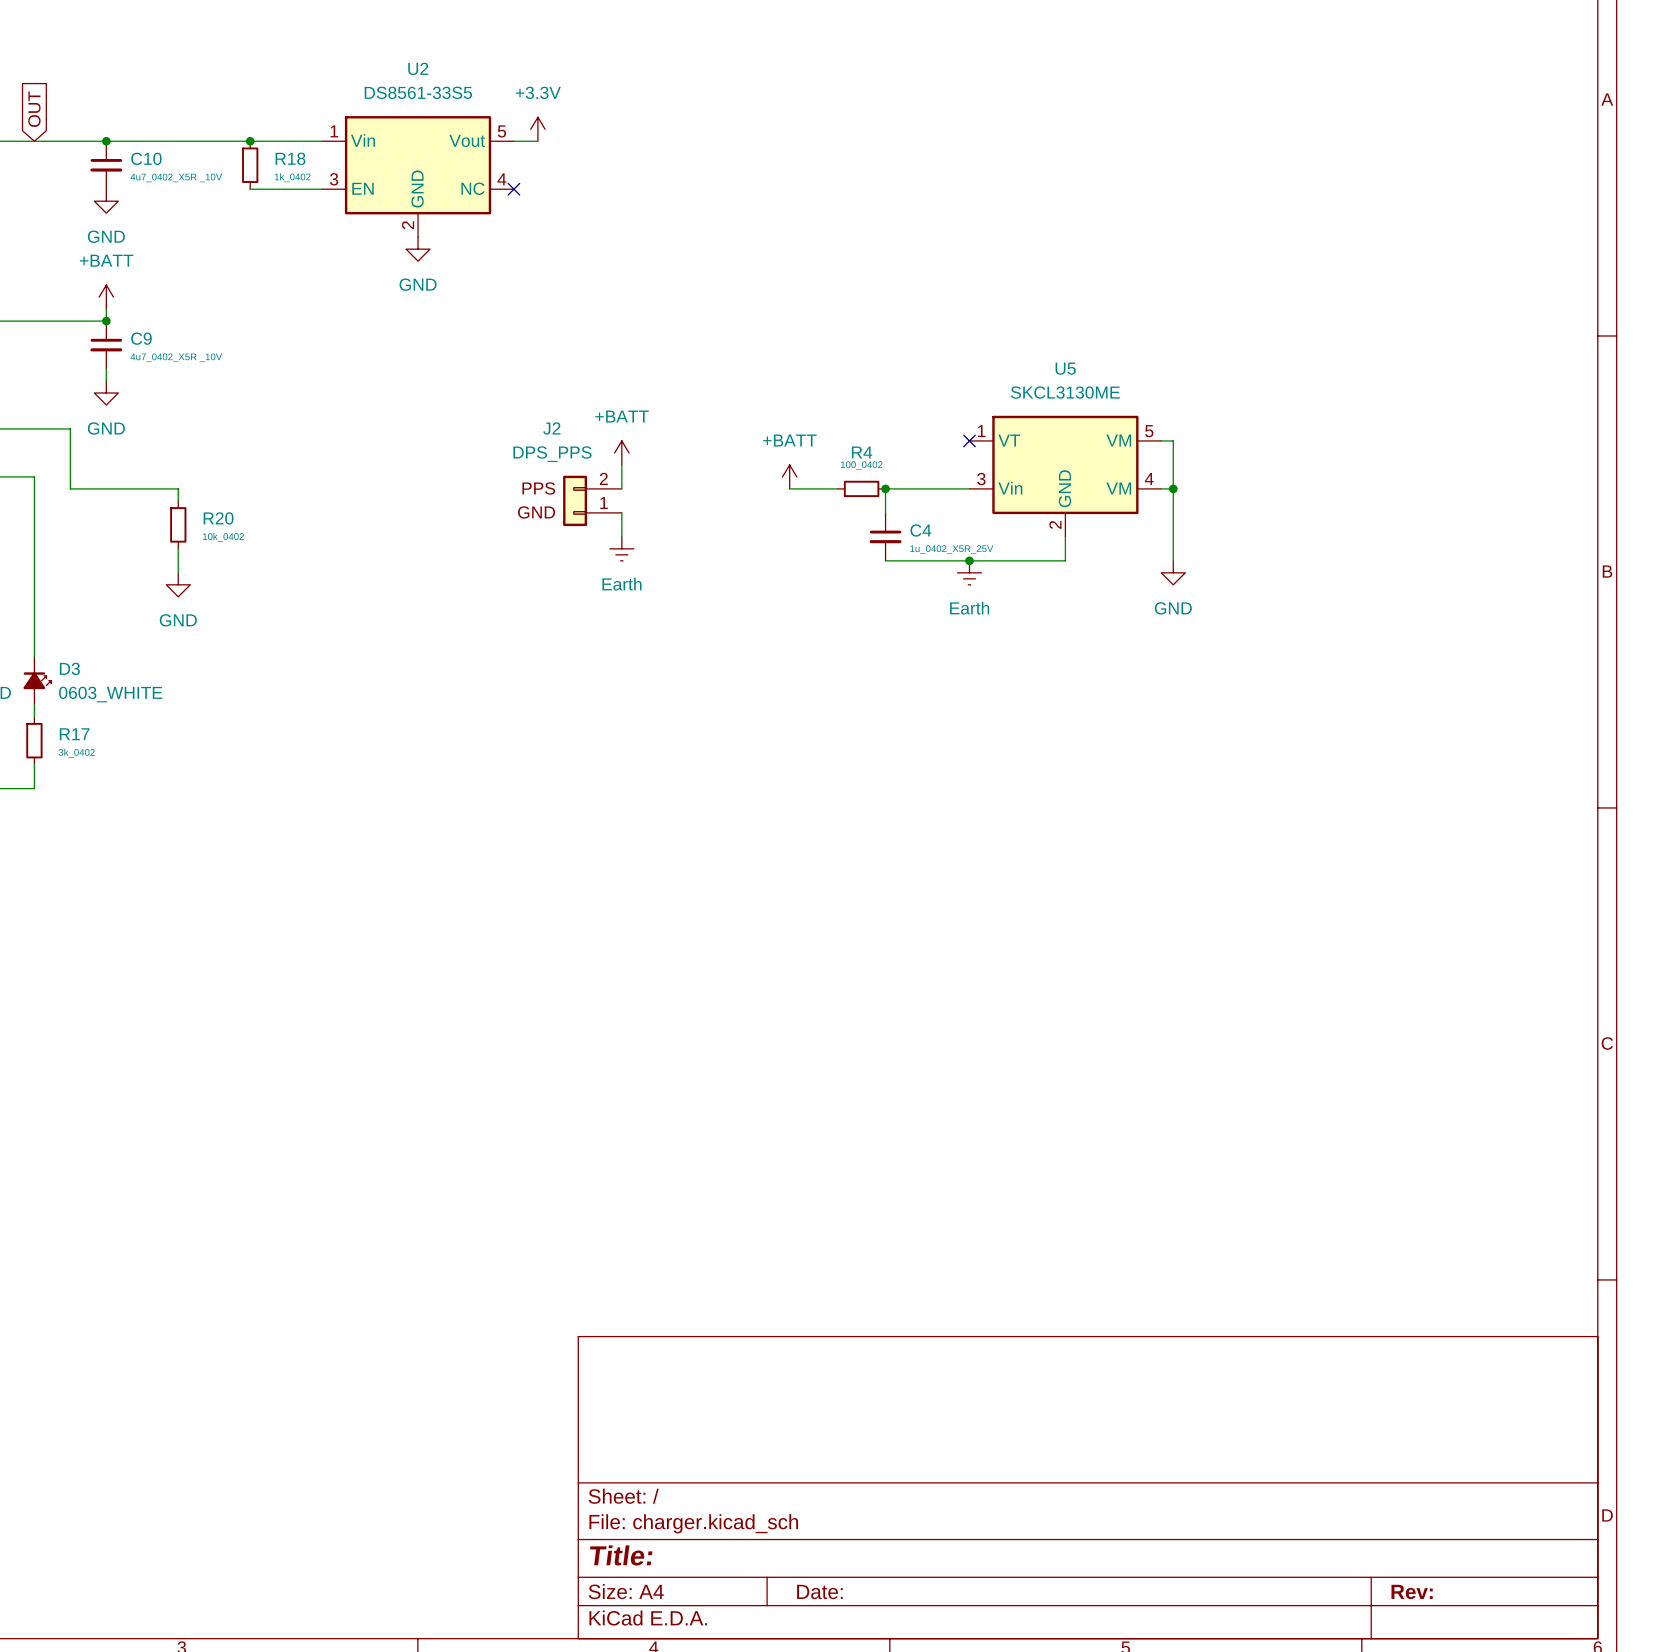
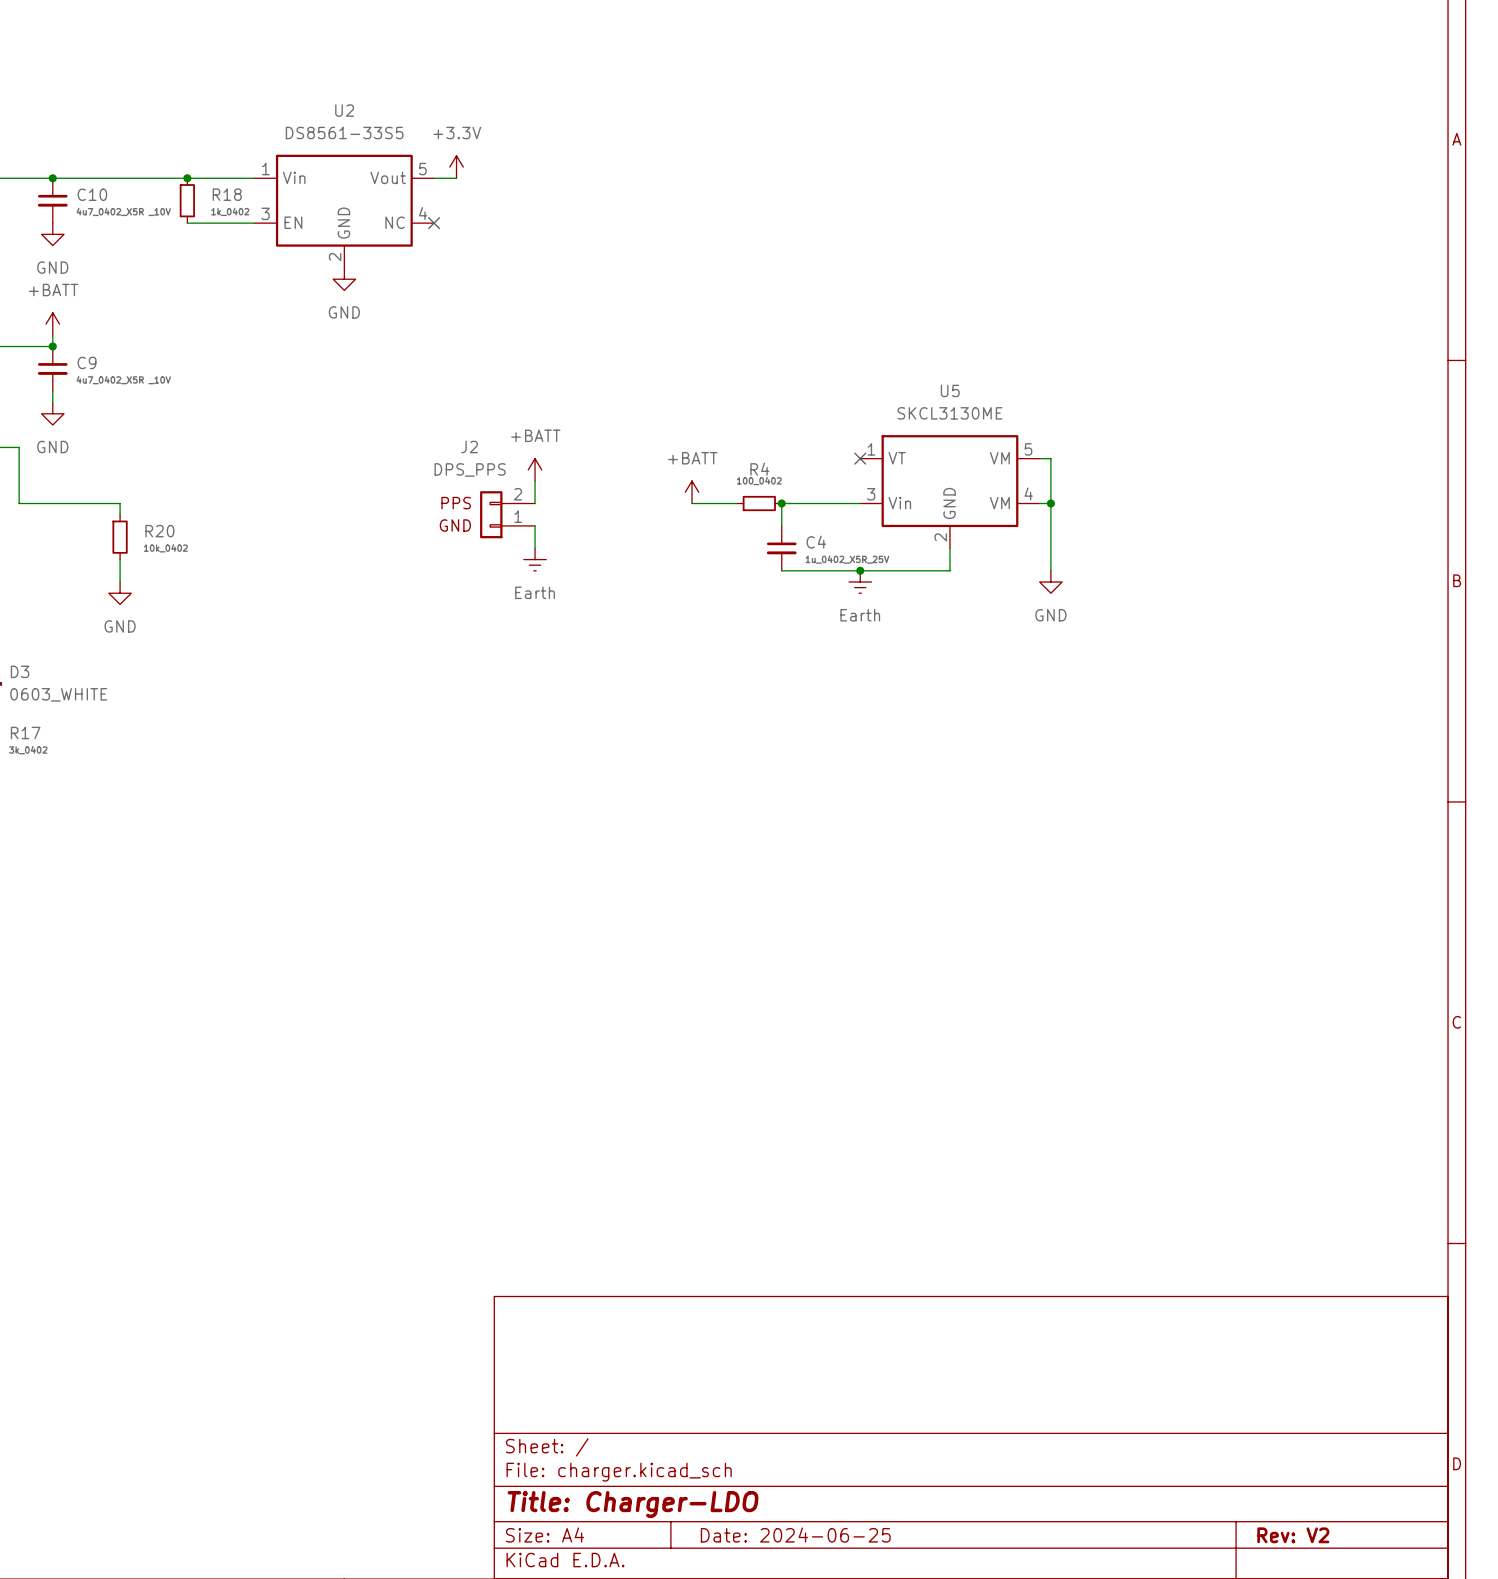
title block: Title: (621, 1555) -> Title: Charger-LDO (633, 1504)
title block: Date: (819, 1591) -> Date: 2024-06-25 (795, 1534)
title block: Rev: (1412, 1591) -> Rev: V2 (1293, 1535)

